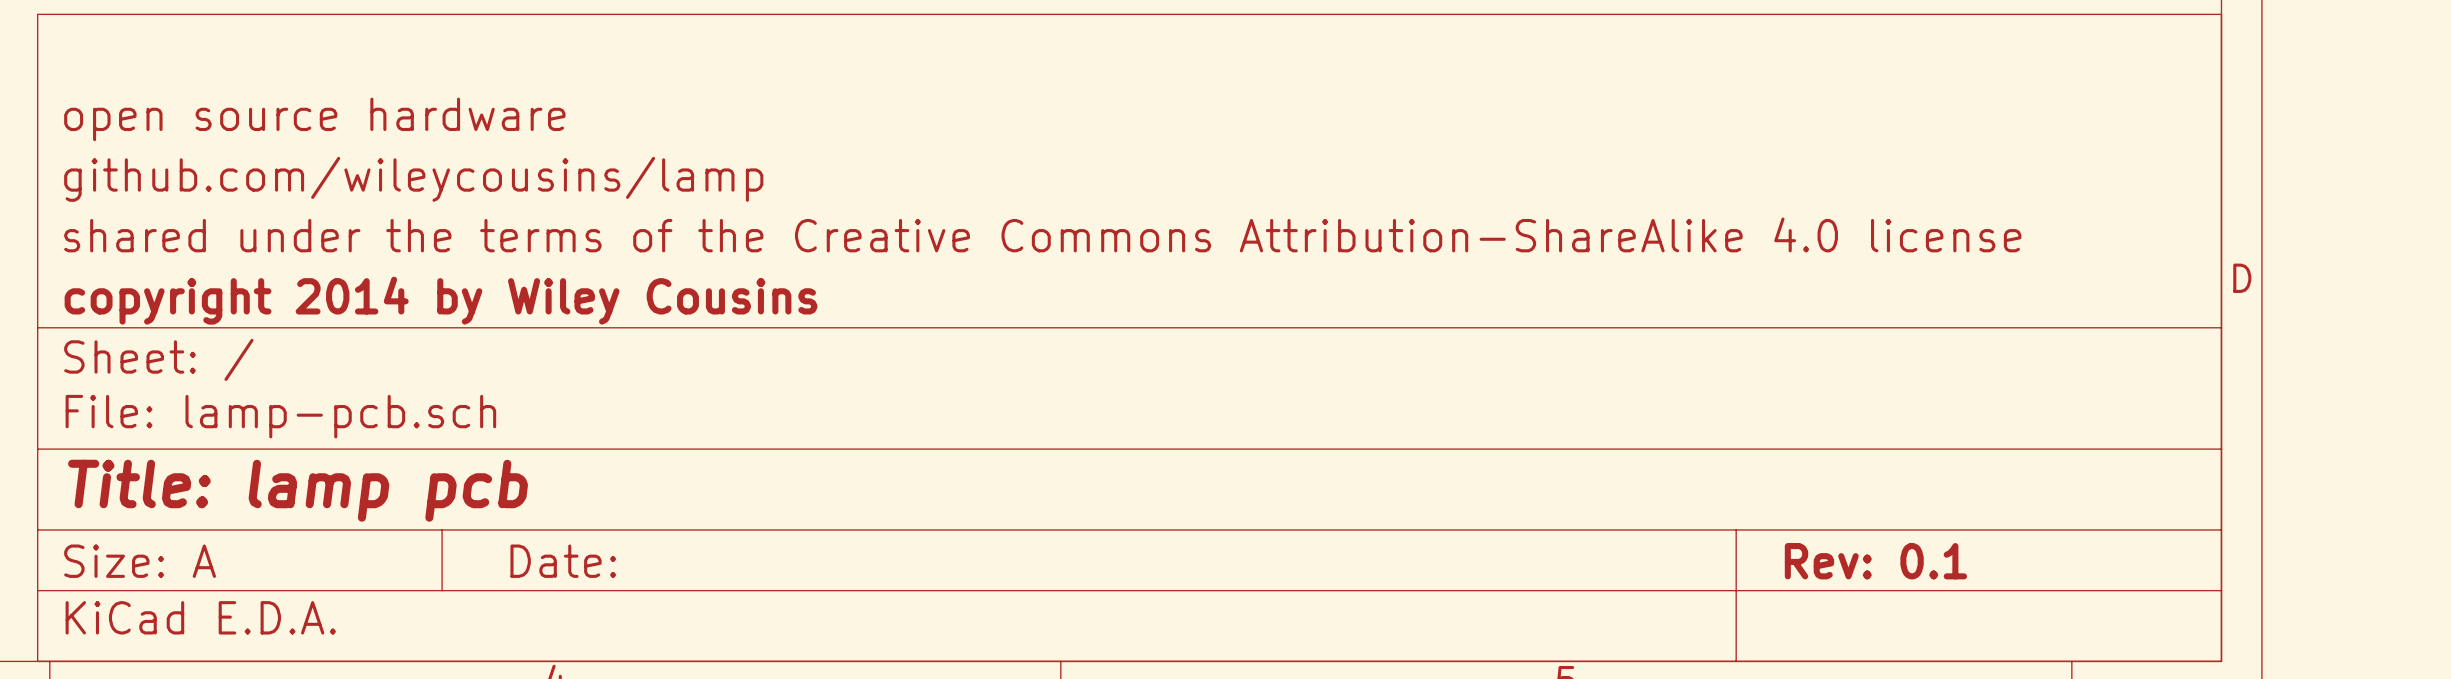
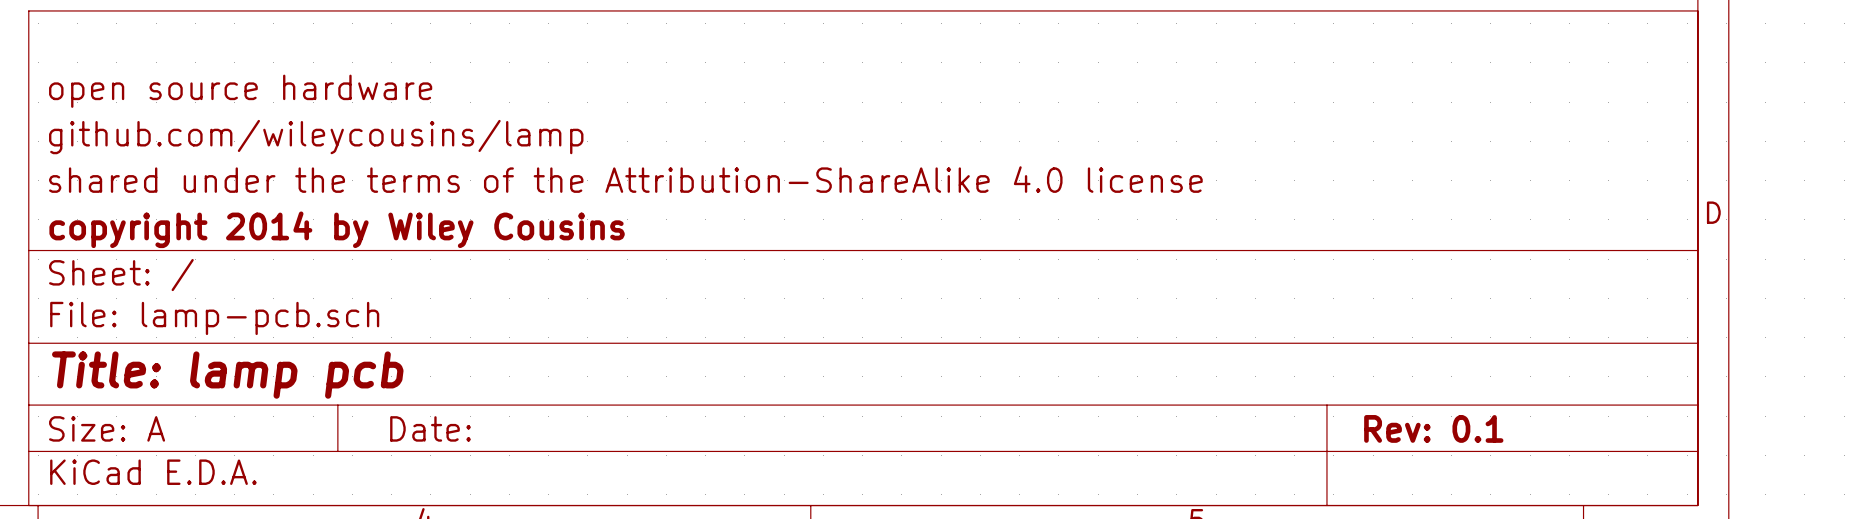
title block: shared under the terms of the Creative Commons Attribution-ShareAlike 4.0 license (1042, 234) -> shared under the terms of the Attribution-ShareAlike 4.0 license (625, 179)

